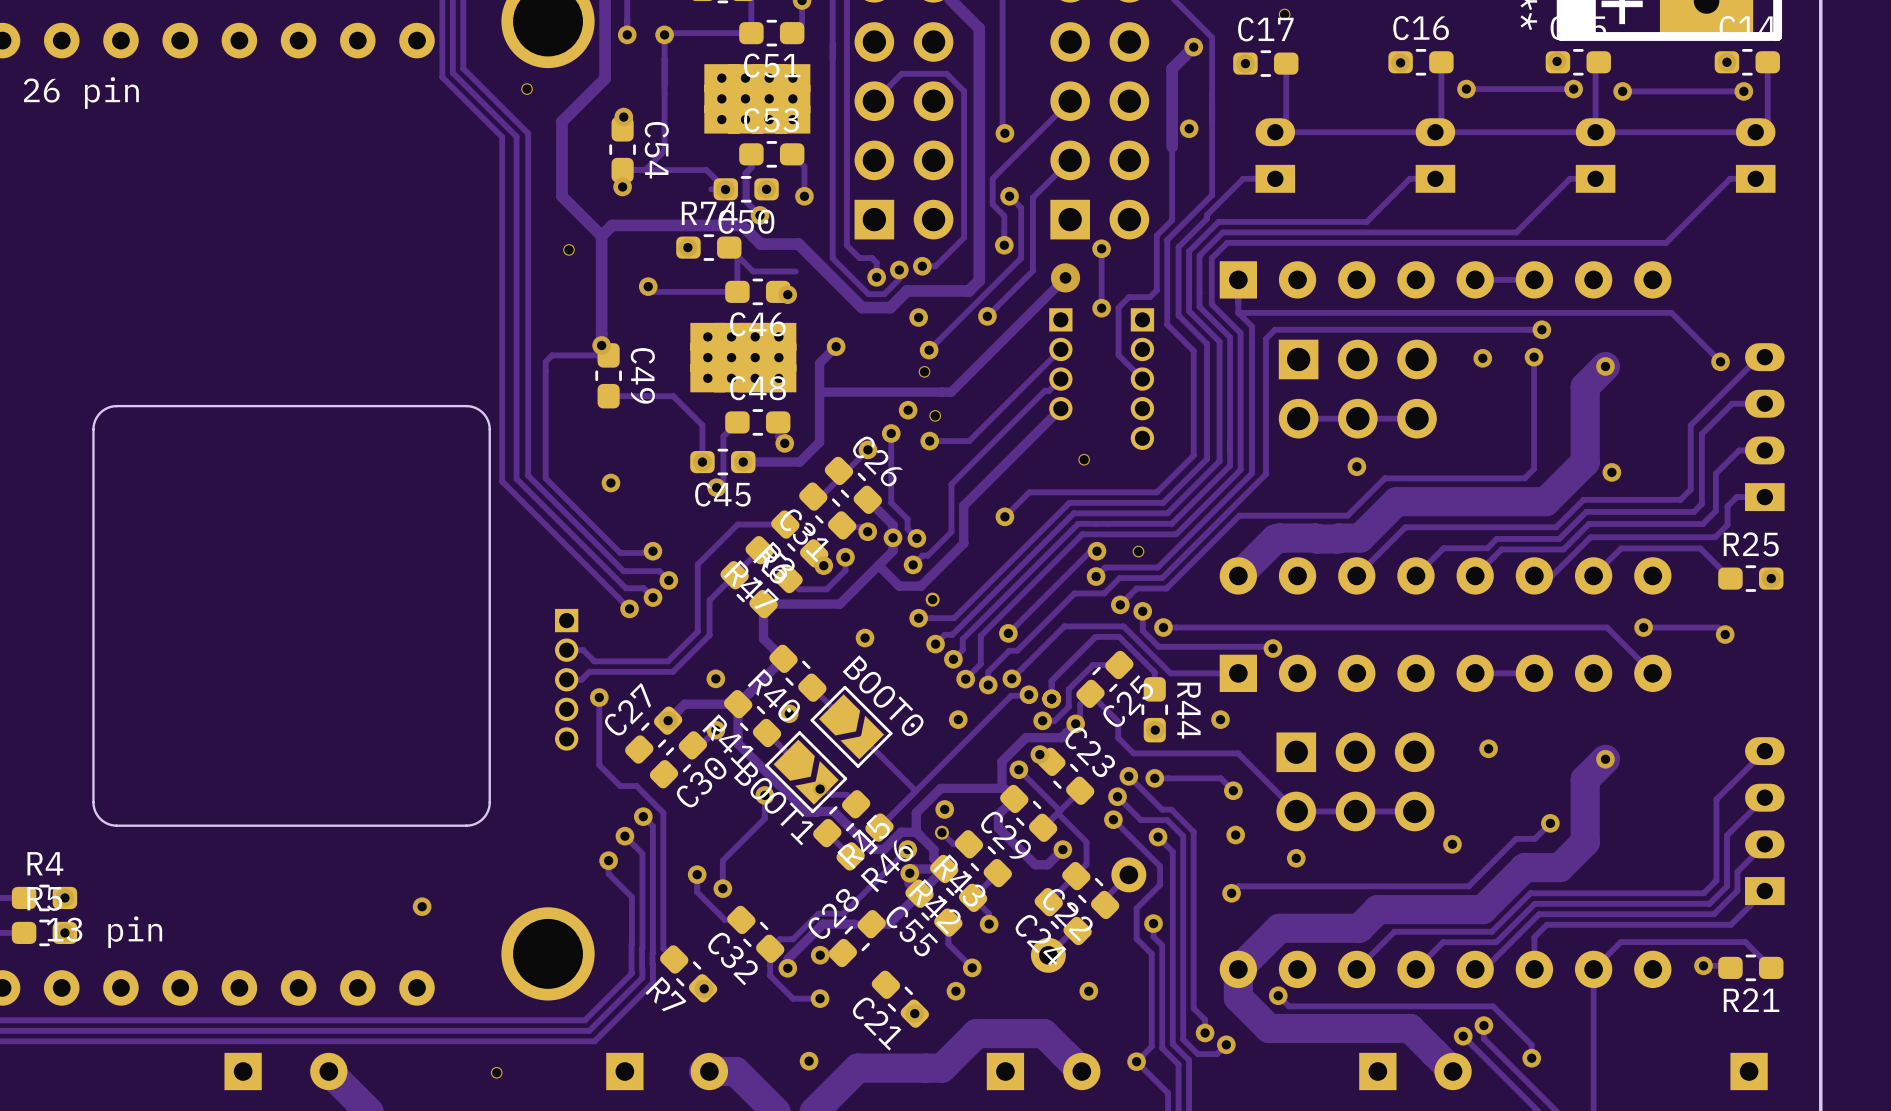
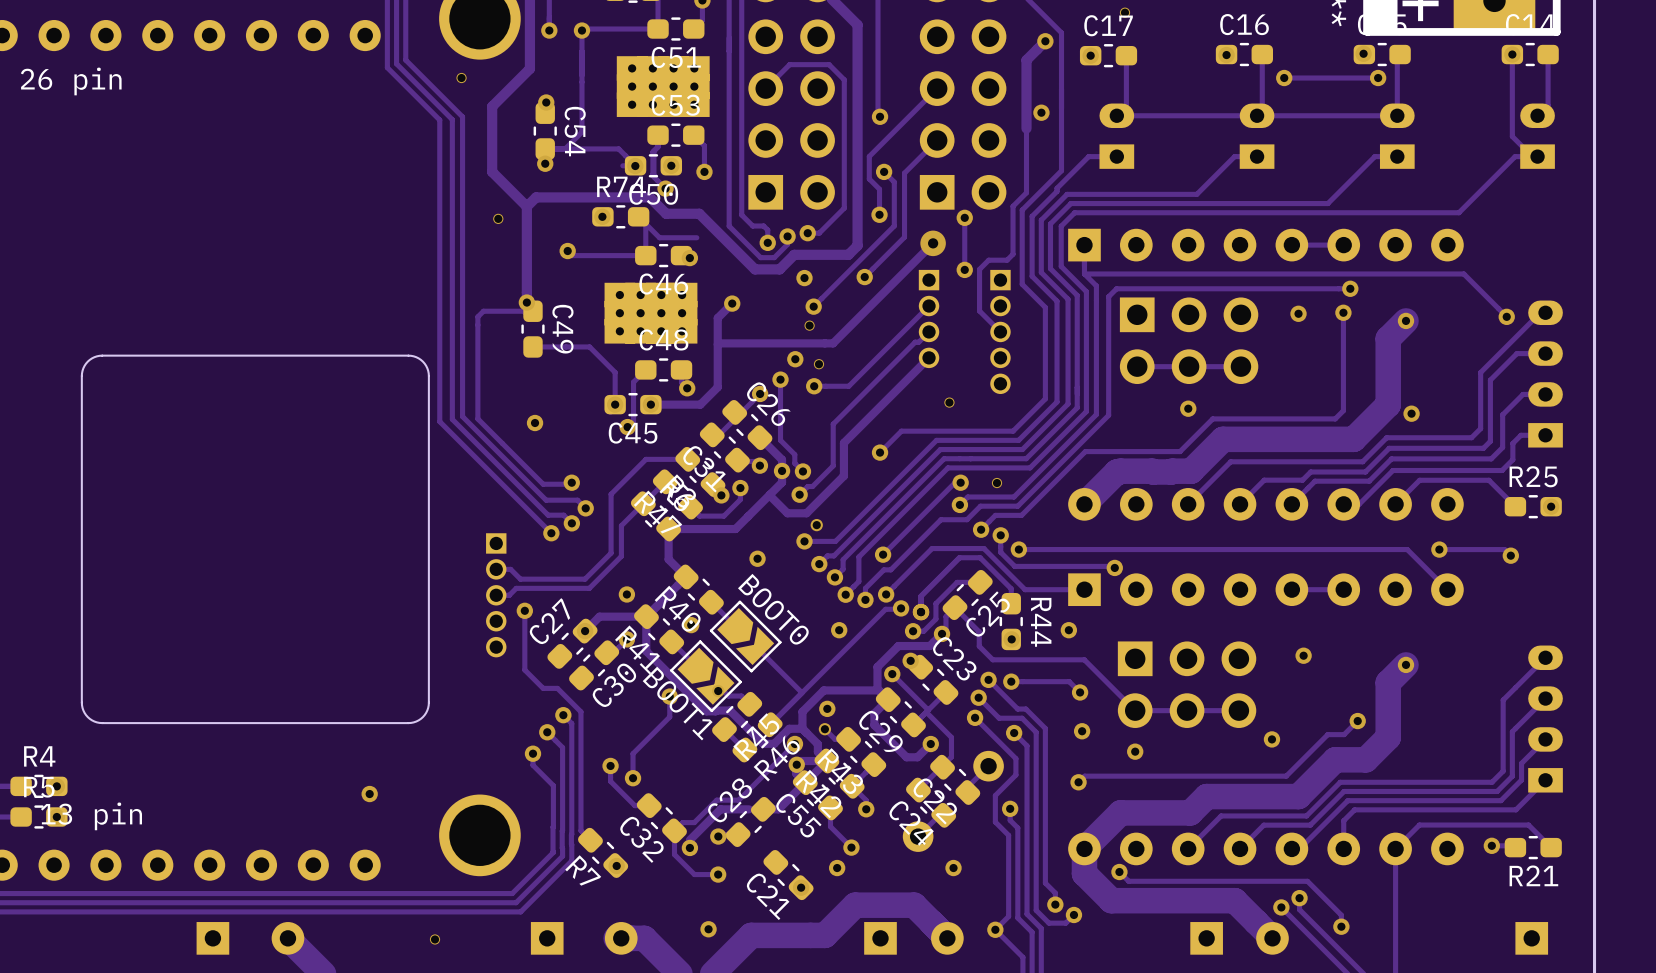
track: none -> (1512, 54) (1512, 136) (1532, 156)
via: (1622, 91) -> none
track: (1743, 91) (1622, 91) -> none
via: (1743, 91) -> none
track: (1755, 132) (1595, 132) -> none

